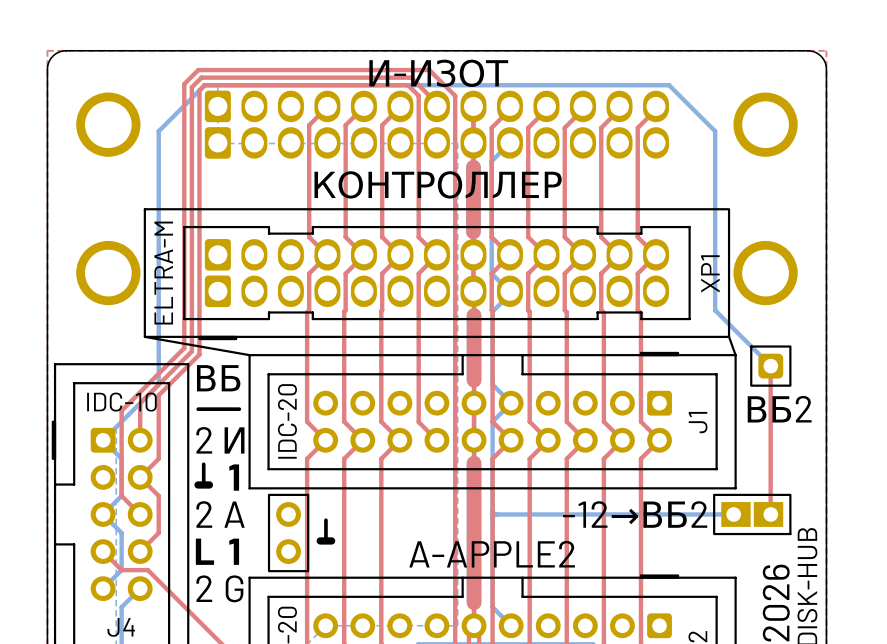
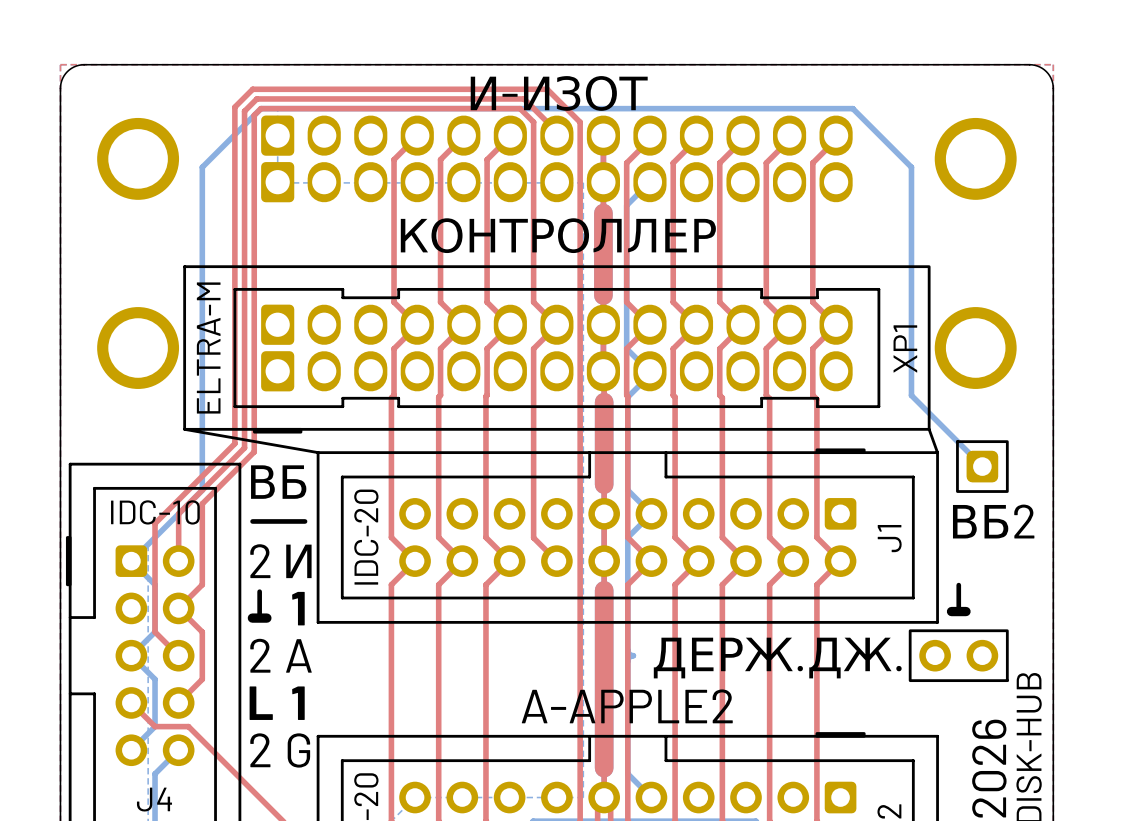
top track: (770, 366) (770, 514) -> none
line: none -> (958, 585) (958, 612)
line: none -> (951, 611) (966, 611)
part footprint: [713, 493, 792, 536] -> [908, 629, 1009, 683]
bottom track: (492, 514) (733, 514) -> none
line: (325, 520) (325, 541) -> none
part: (288, 533) -> none
line: (320, 540) (331, 540) -> none

